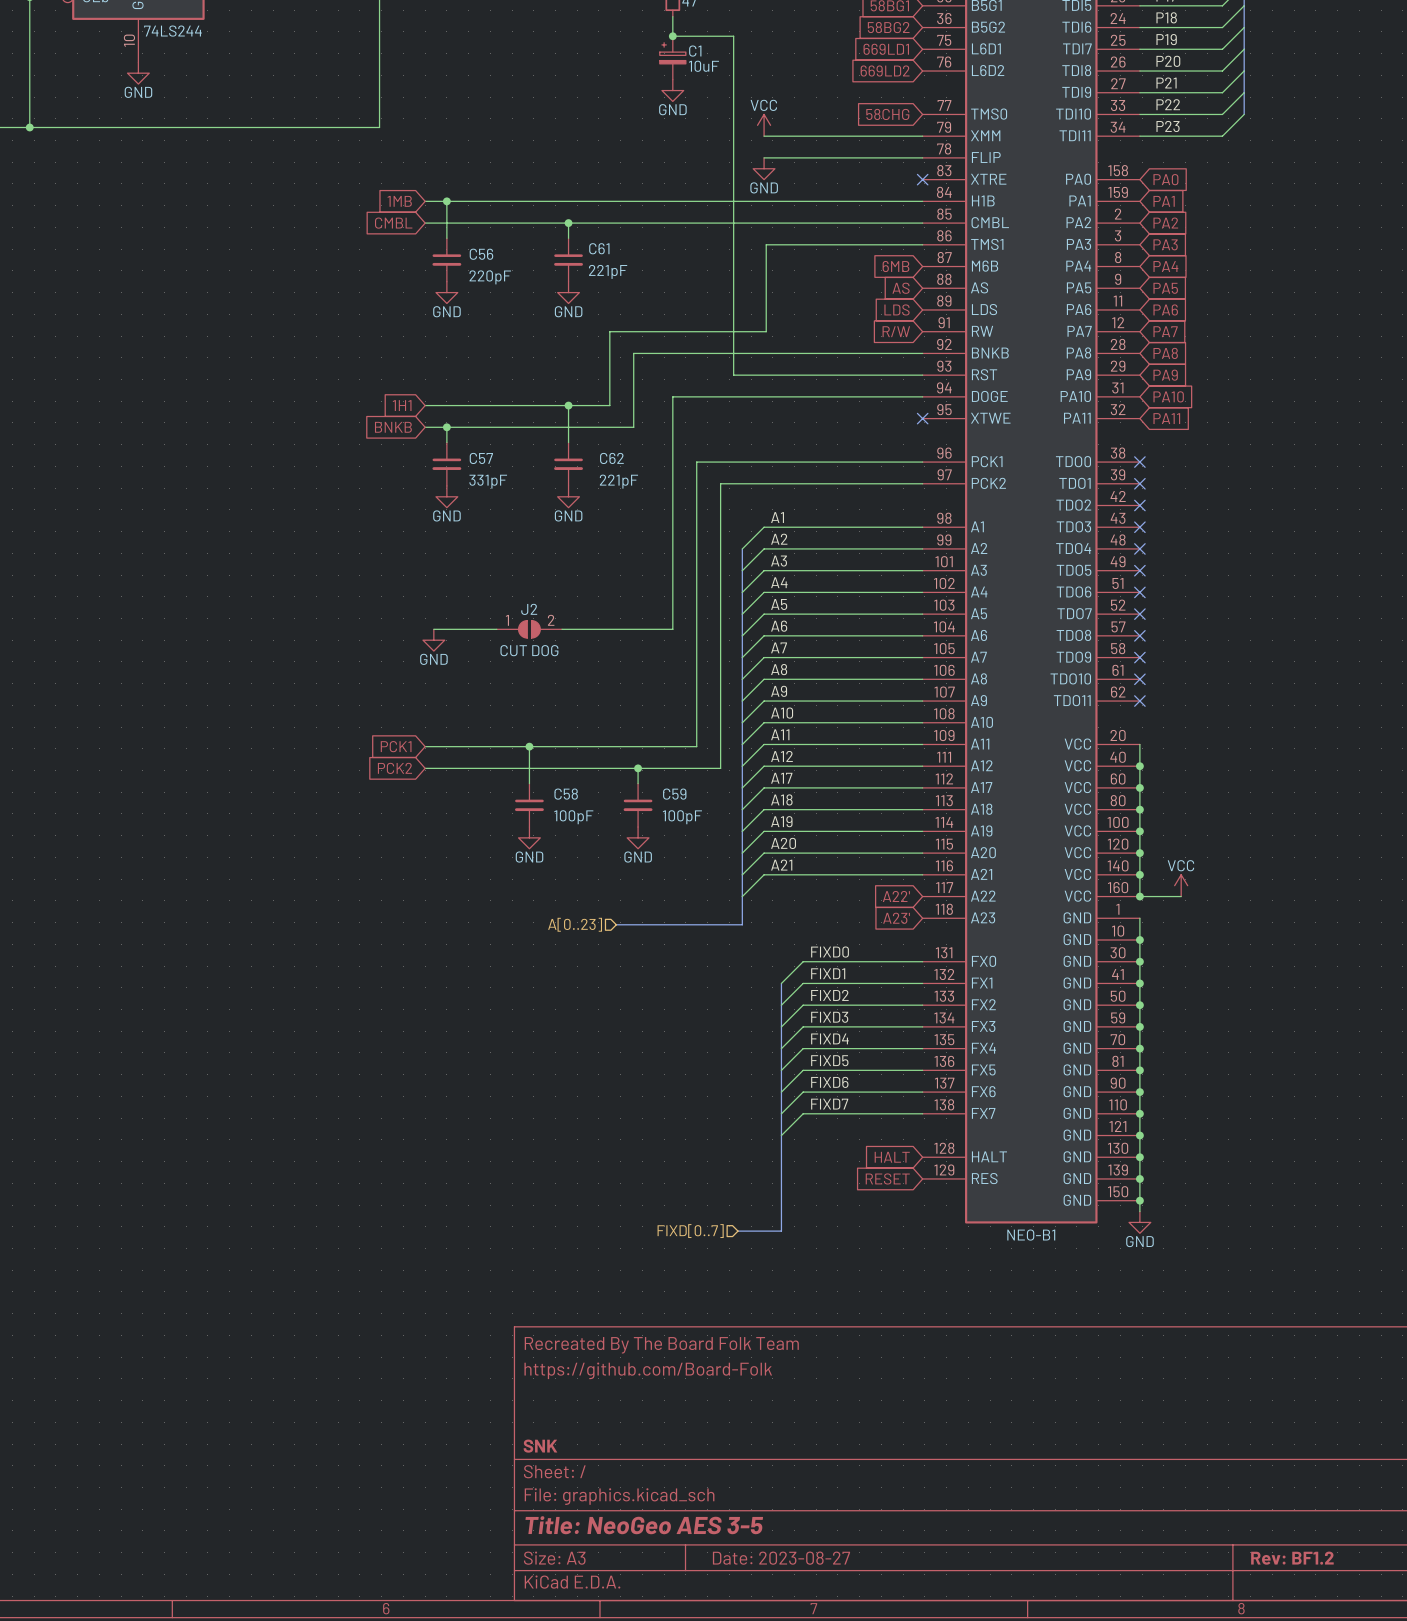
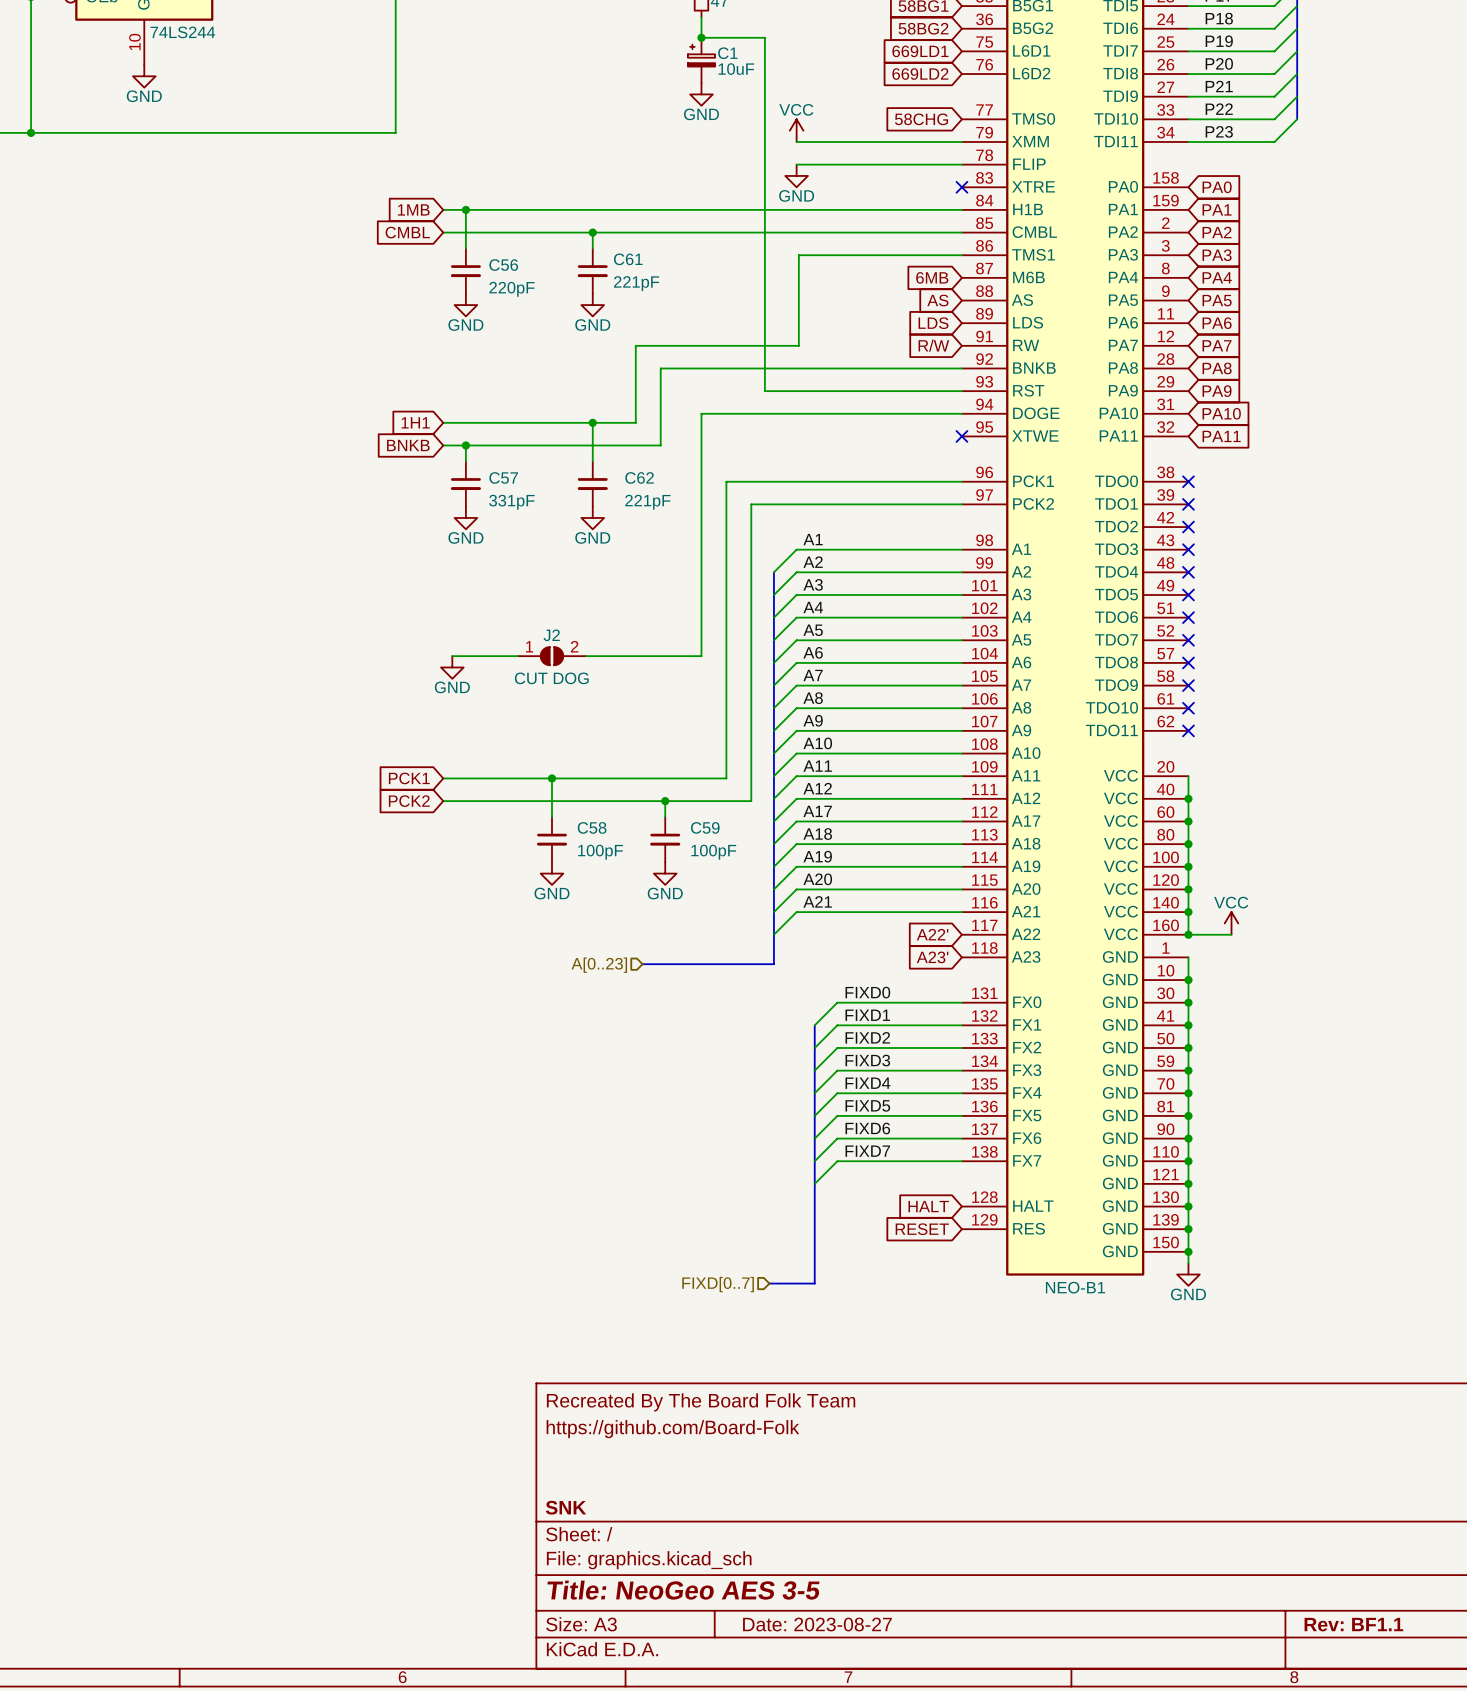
title block: Rev: BF1.2 (1292, 1558) -> Rev: BF1.1 (1353, 1624)

